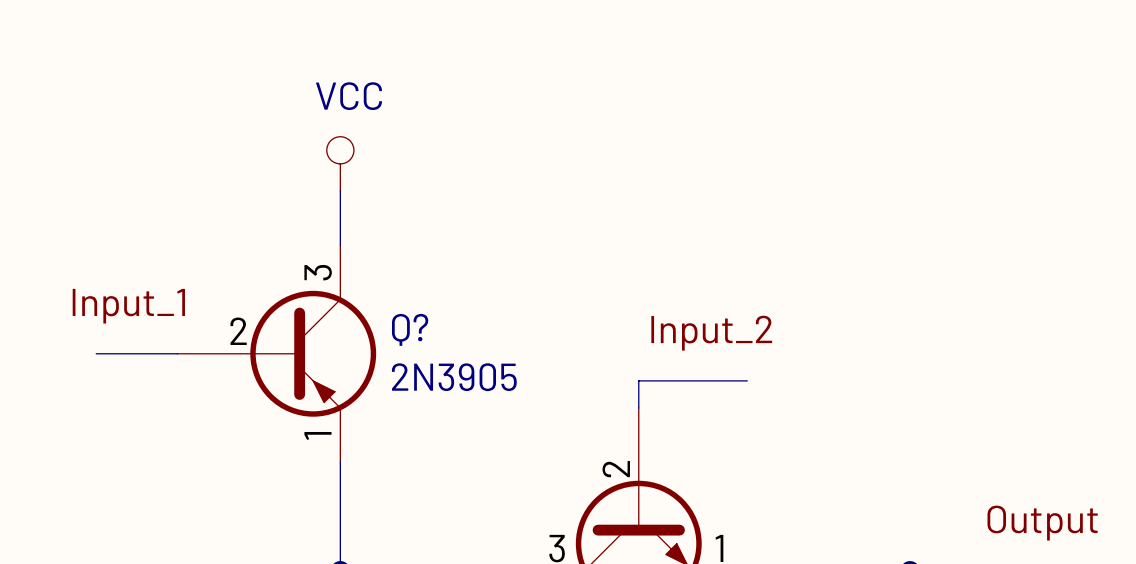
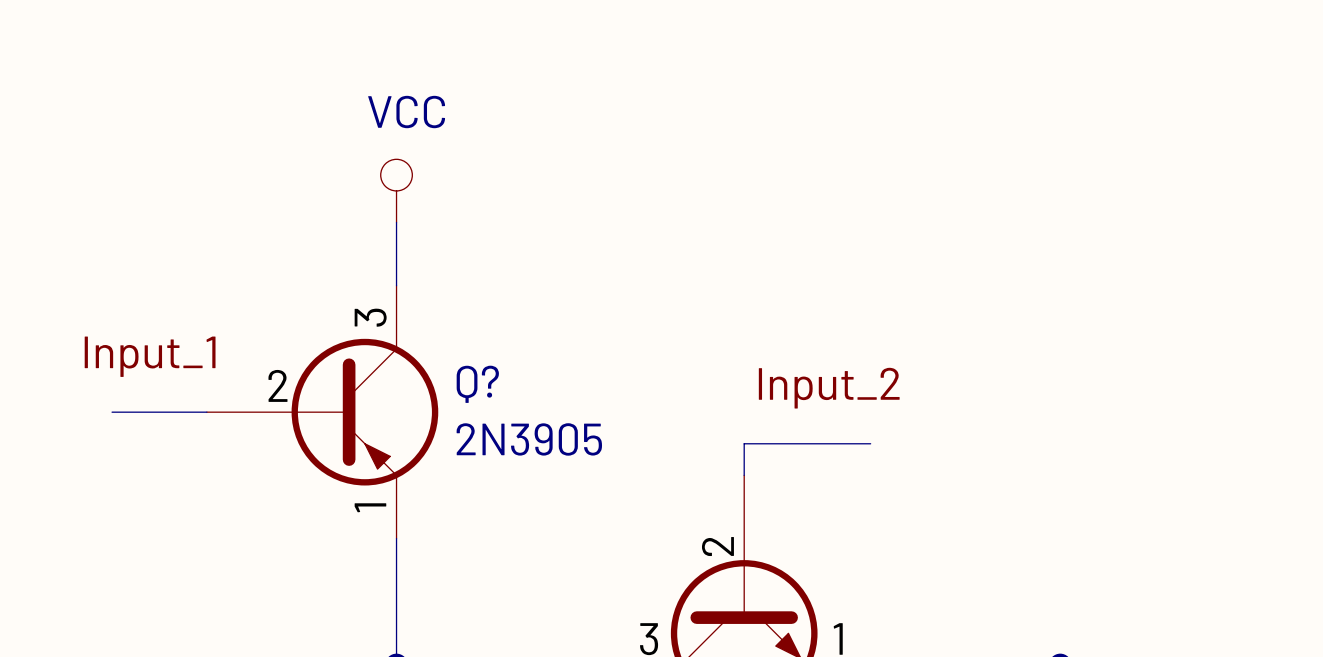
label: Output (1042, 523) -> none

